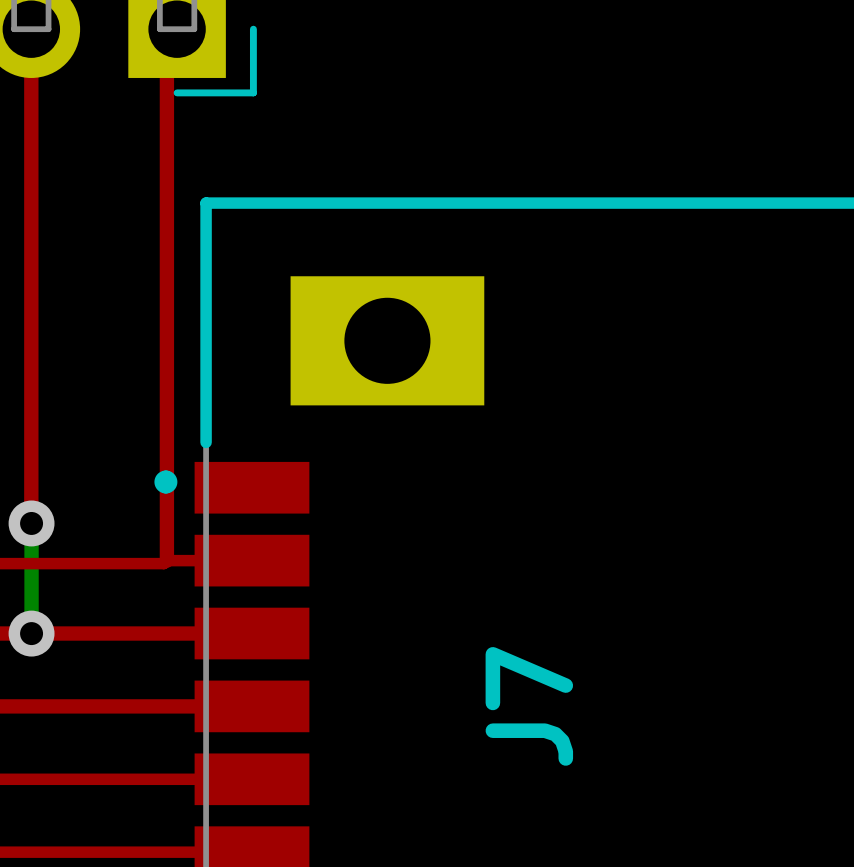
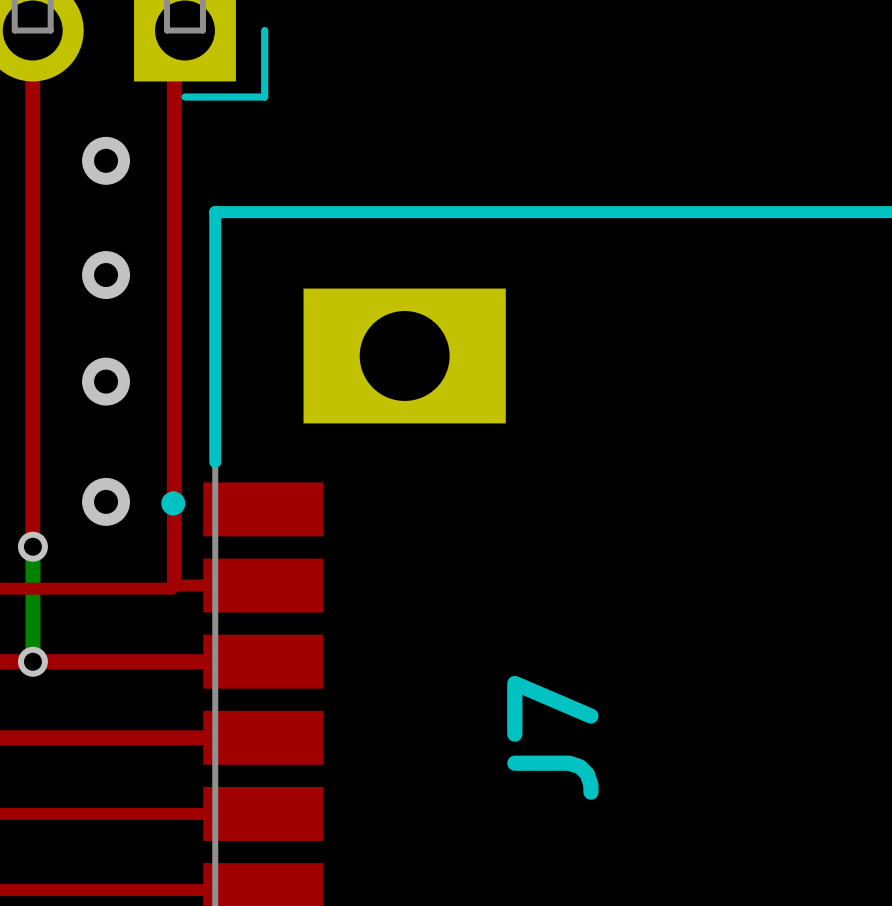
via: none -> (106, 160)
via: none -> (106, 275)
via: none -> (106, 381)
via: none -> (106, 501)
via size: [8, 500, 55, 547] -> [17, 531, 48, 562]
via size: [8, 610, 55, 657] -> [17, 646, 48, 677]

